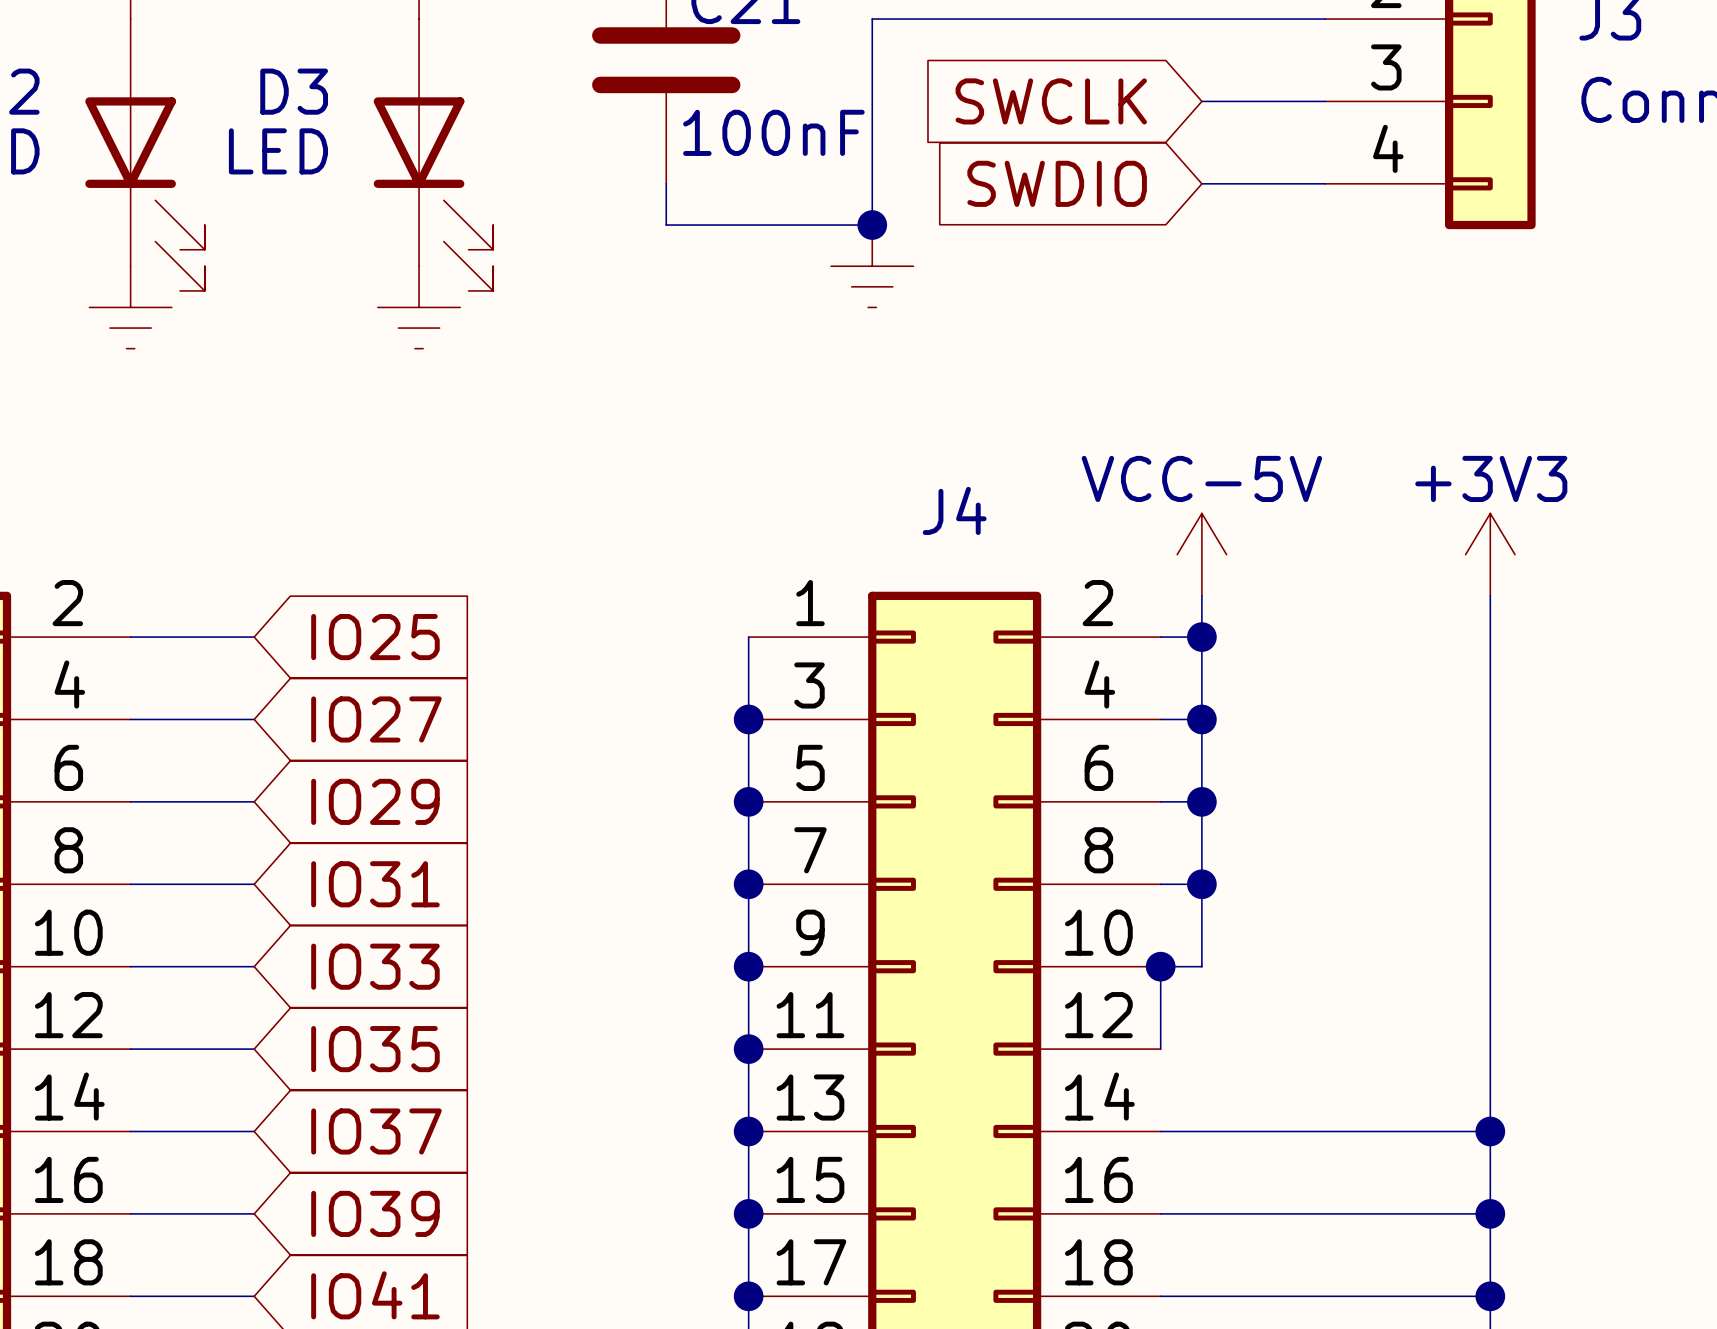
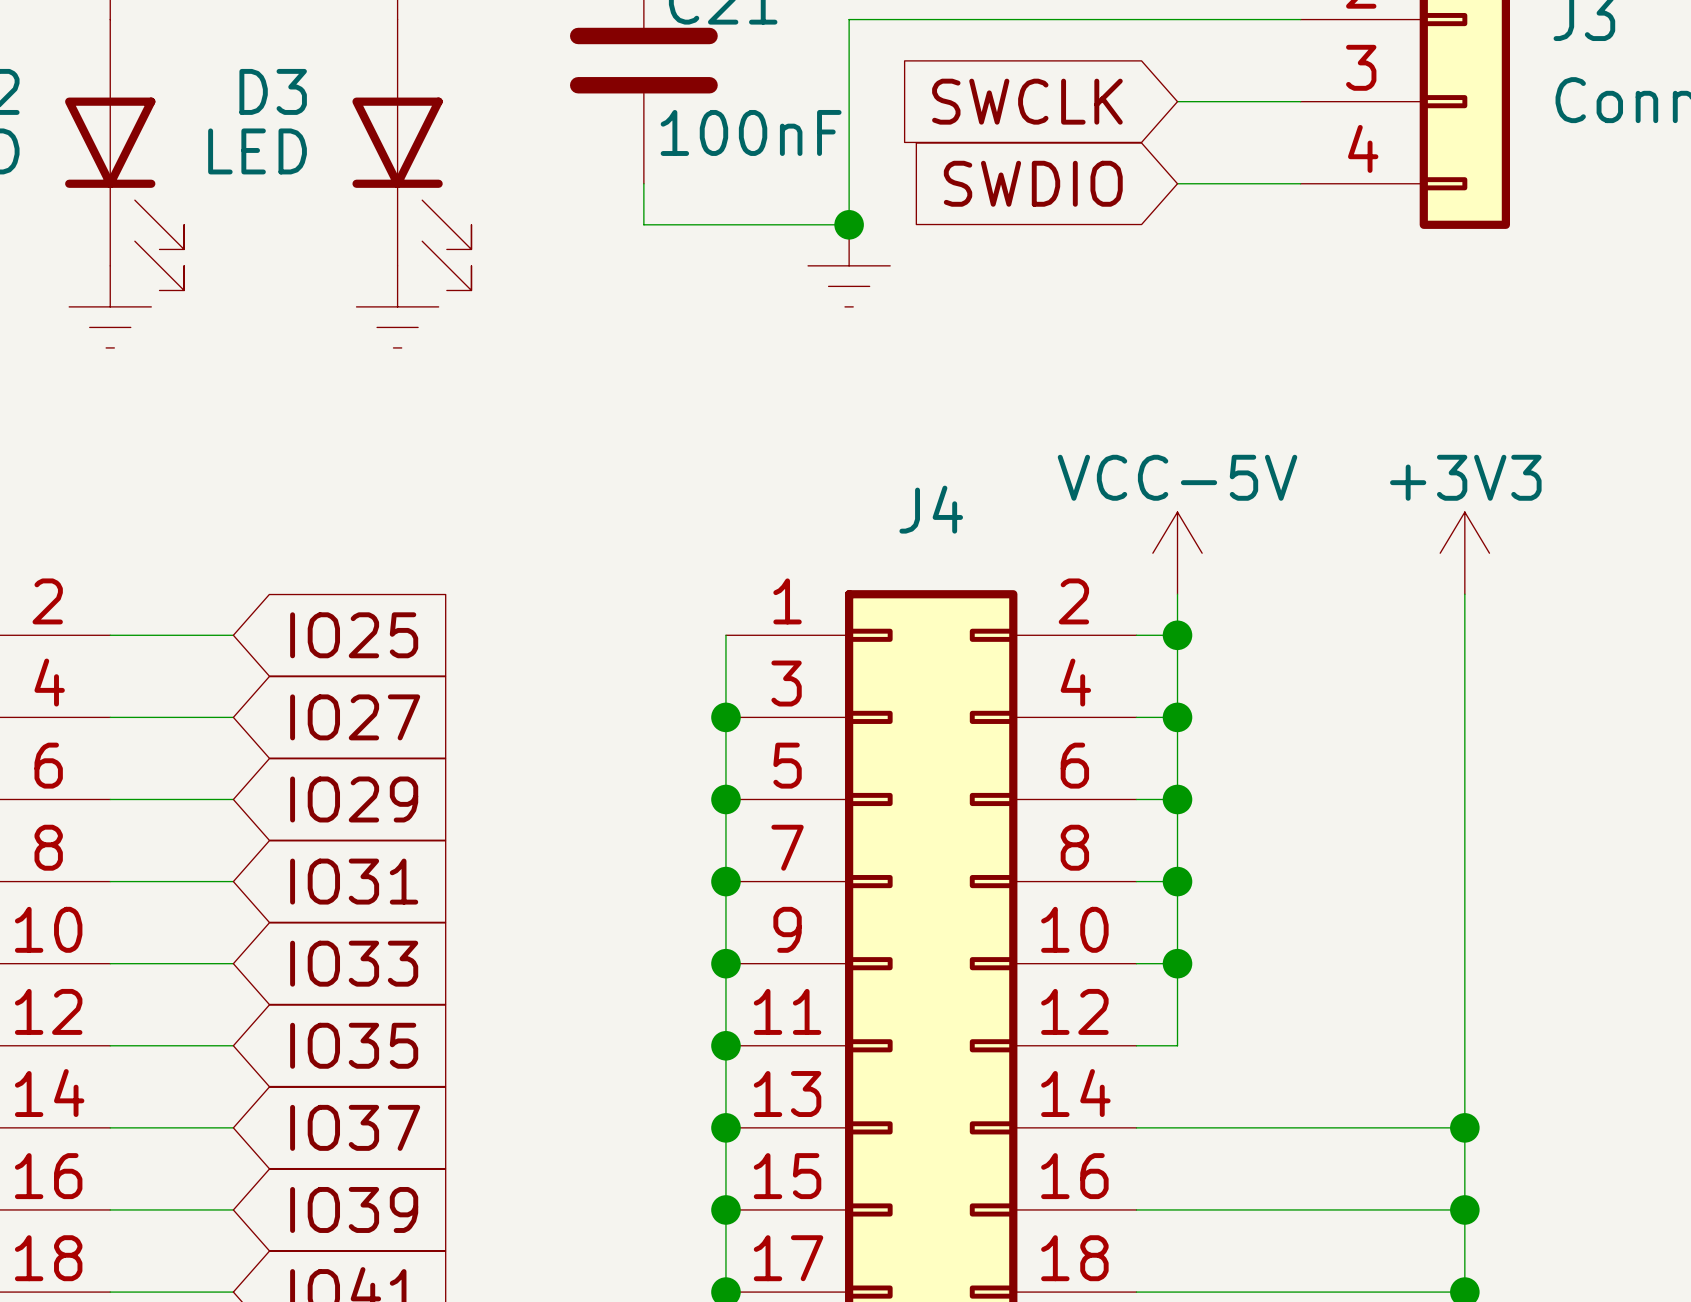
wire: (1160, 966) (1160, 1049) -> (1177, 963) (1177, 1045) (1136, 1045)
junction position: (1160, 966) -> (1177, 963)

